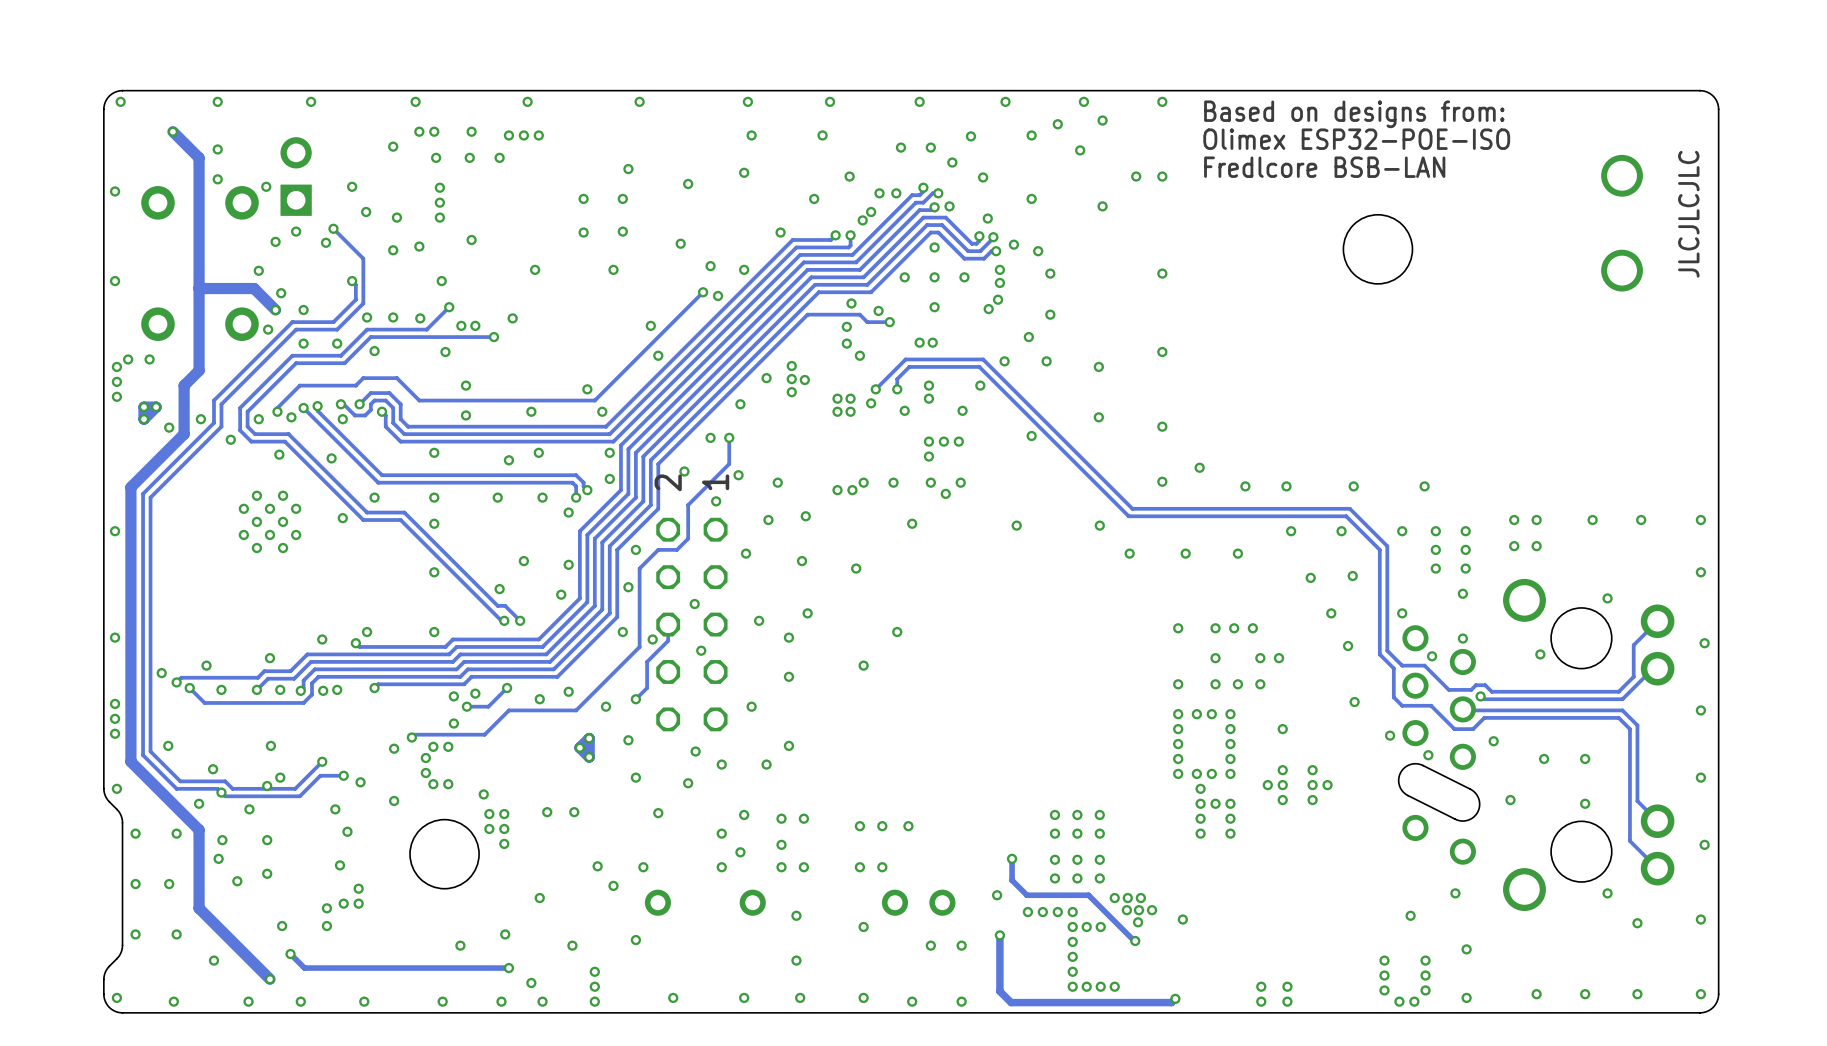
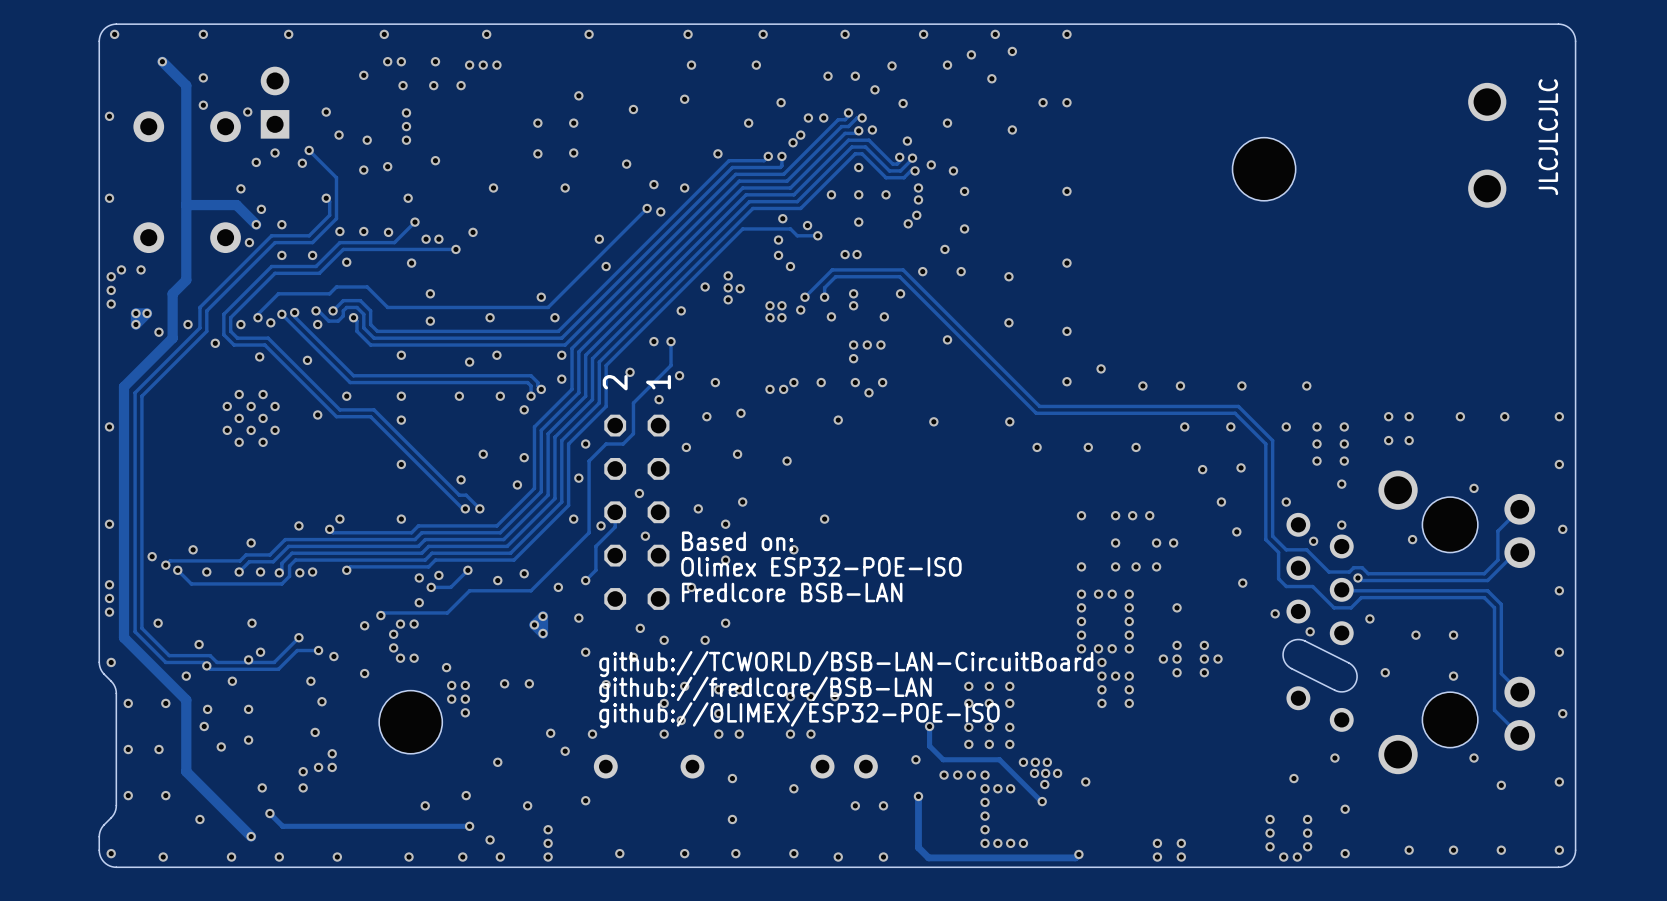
text: Based on designs from: (1354, 114) -> none
text: Olimex ESP32-POE-ISO (1356, 139) -> none
text: Fredlcore BSB-LAN (1324, 167) -> none
text: none -> Based on: (737, 541)
text: none -> Olimex ESP32-POE-ISO (821, 566)
text: none -> Fredlcore BSB-LAN (792, 592)
text: none -> github://TCWORLD/BSB-LAN-CircuitBoard (846, 664)
text: none -> github://fredlcore/BSB-LAN (765, 689)
text: none -> github://OLIMEX/ESP32-POE-ISO (799, 715)

